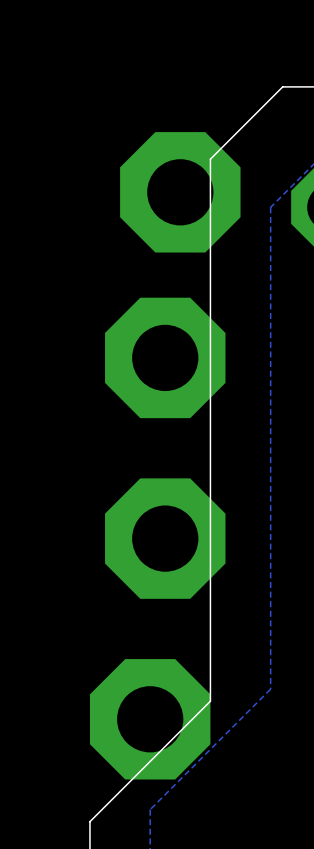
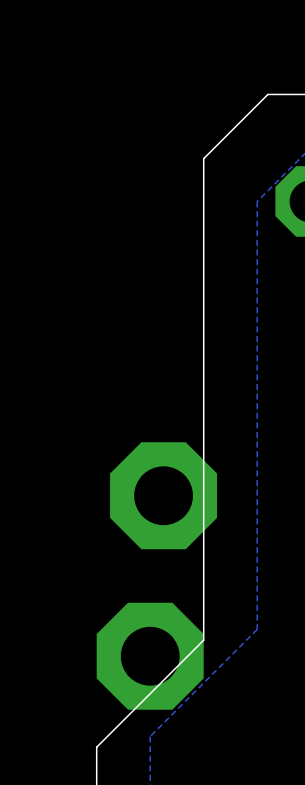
part: (180, 192) -> none
part: (165, 357) -> none

